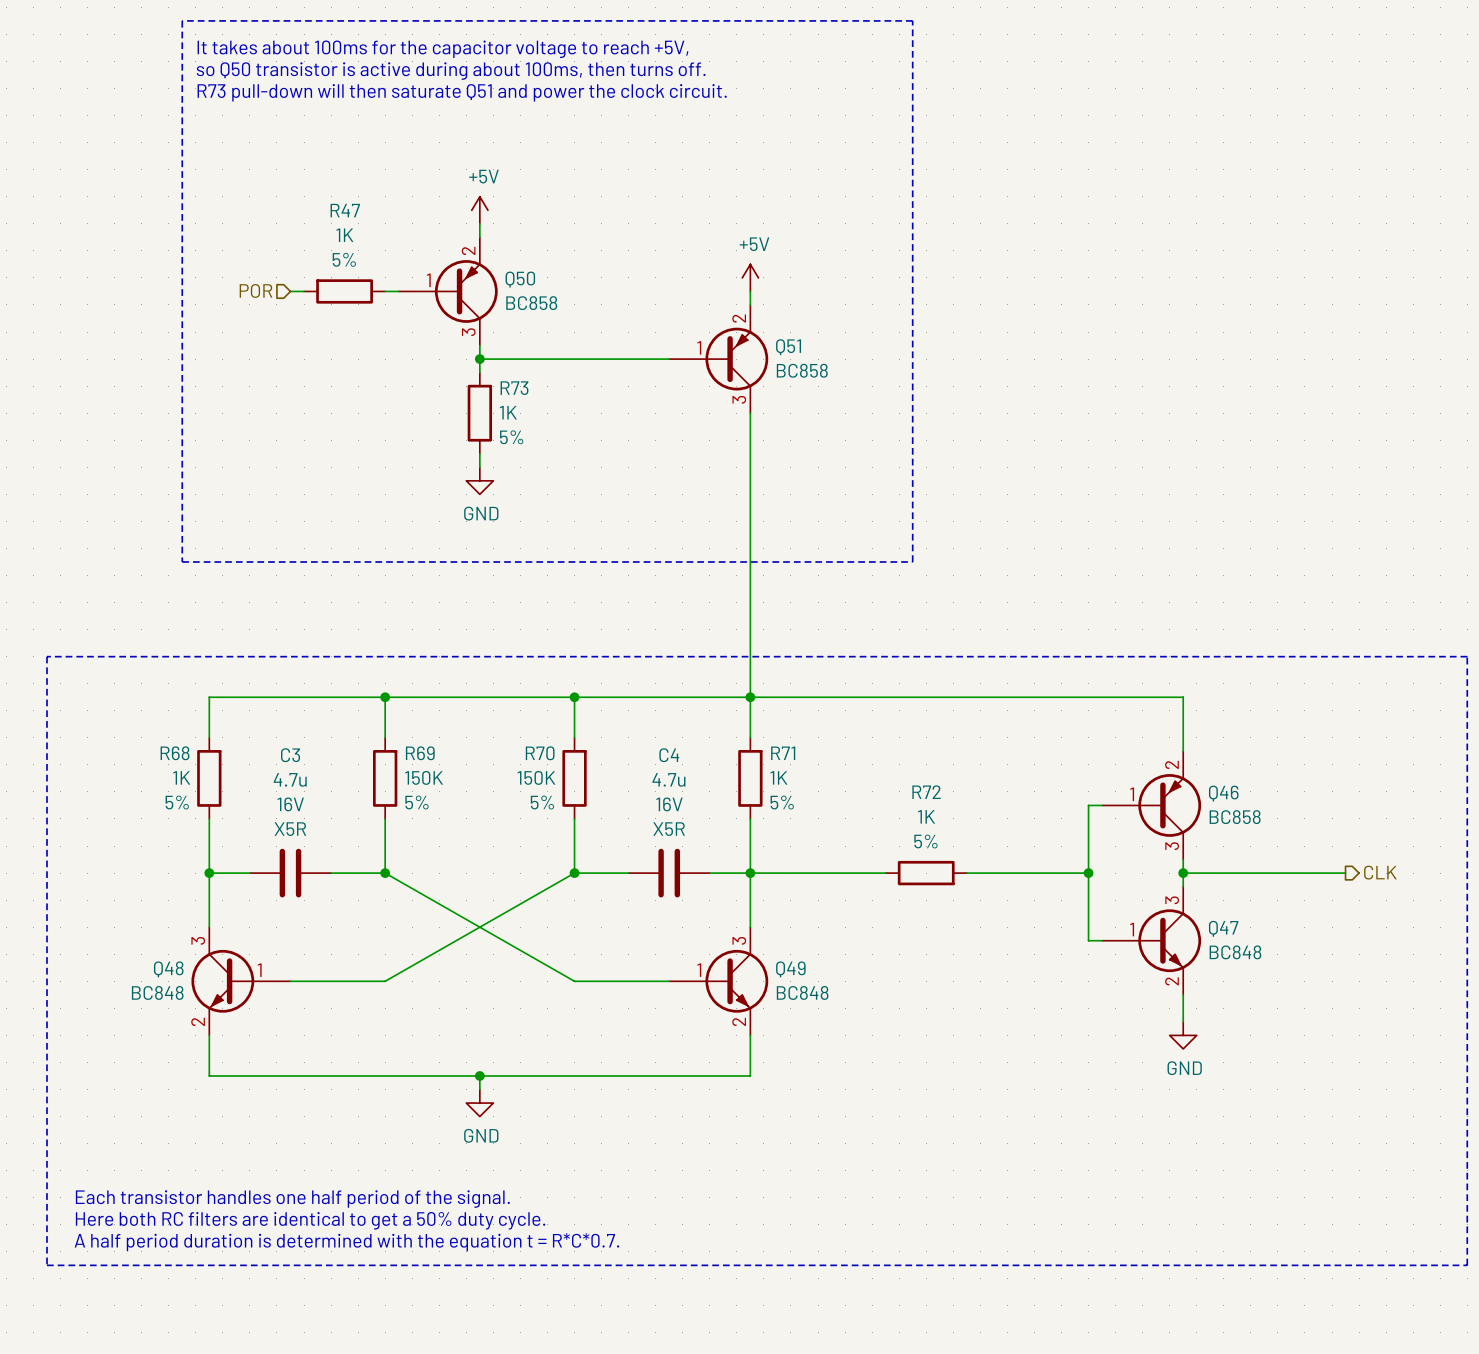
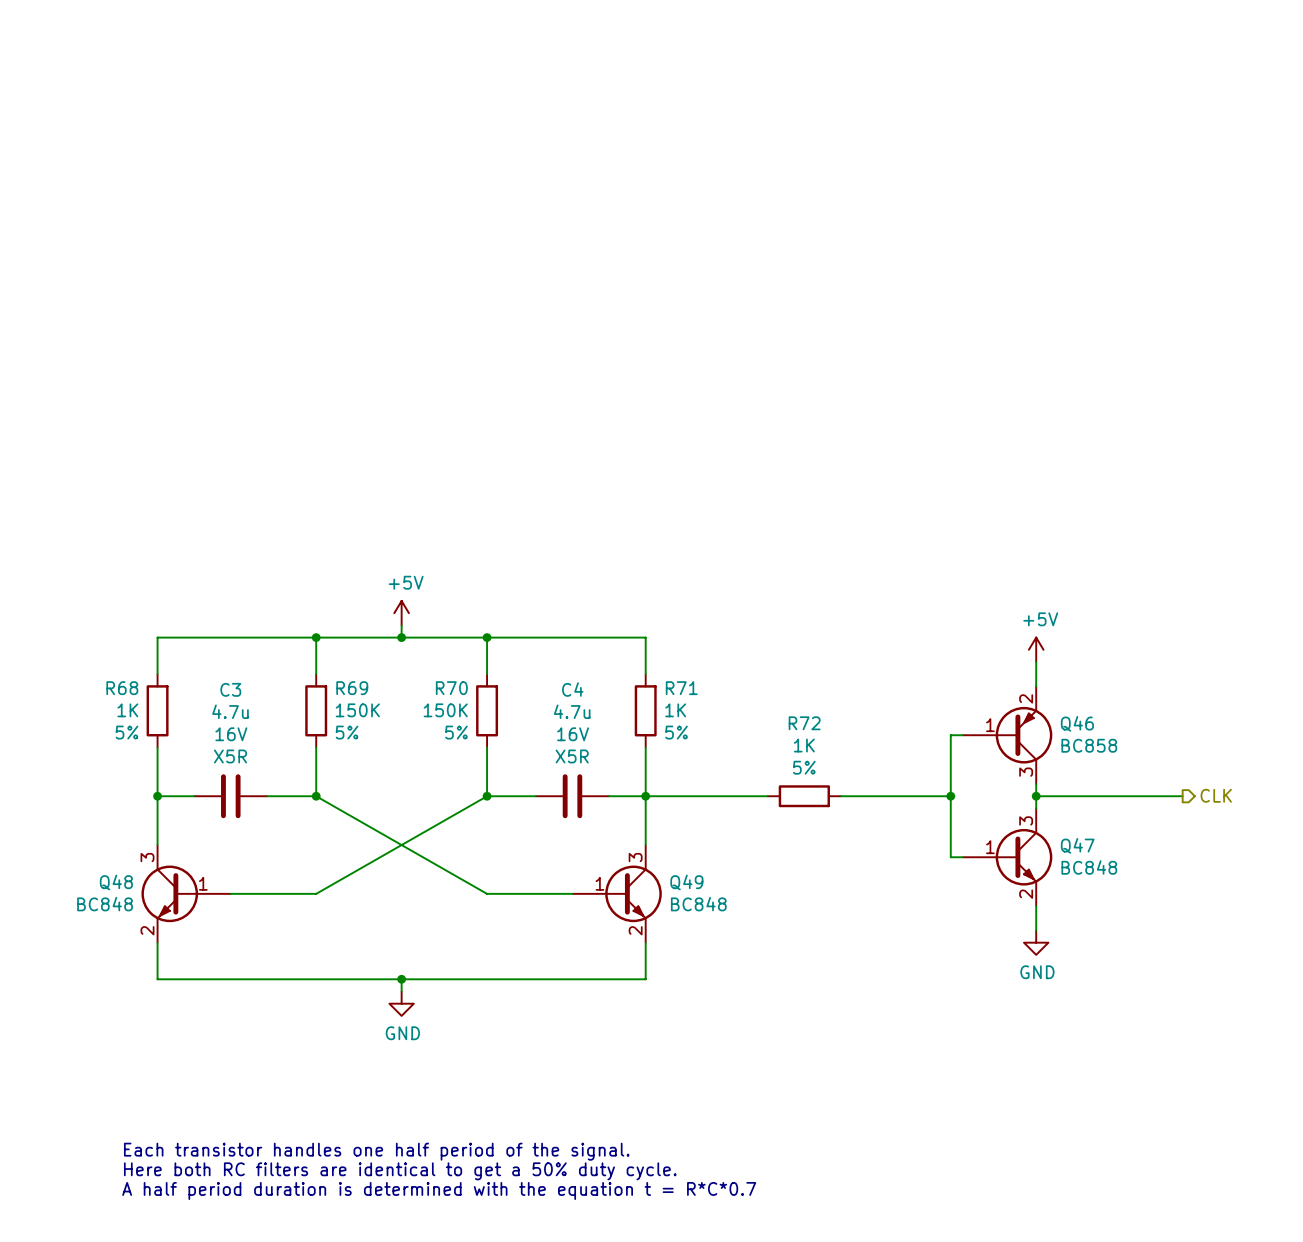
line: (182, 20) (182, 561) (912, 561) (912, 20) (182, 20) -> none
text: It takes about 100ms for the capacitor voltage to reach +5V, (443, 49) -> none
text: so Q50 transistor is active during about 100ms, then turns off. (451, 71) -> none
text: R73 pull-down will then saturate Q51 and power the clock circuit. (462, 92) -> none
power symbol: +5V (479, 210) -> none
wire: (479, 223) (479, 237) -> none
power symbol: +5V (750, 277) -> none
hierarchical label: POR (256, 290) -> none
wire: (290, 291) (304, 291) -> none
R47: 1K (344, 291) -> none
wire: (385, 291) (398, 291) -> none
Q50: BC858 (448, 291) -> none
wire: (750, 291) (750, 304) -> none
wire: (479, 345) (479, 372) -> none
wire: (479, 359) (669, 359) -> none
junction: (479, 359) -> none
Q51: BC858 (718, 359) -> none
R73: 1K (479, 413) -> none
wire: (750, 413) (750, 697) (1183, 697) (1183, 724) -> none
wire: (479, 453) (479, 467) -> (401, 625) (401, 637)
power symbol: GND (479, 480) -> none
line: (47, 656) (47, 1265) (1467, 1265) (1467, 656) (47, 656) -> none
power symbol: none -> +5V (401, 613)
junction: none -> (401, 637)
junction: (750, 697) -> none
power symbol: none -> +5V (1036, 649)
text position: Each transistor handles one half period of the signal. (292, 1199) -> Each transistor handles one half period of the signal. (376, 1151)
text position: Here both RC filters are identical to get a 50% duty cycle. (310, 1220) -> Here both RC filters are identical to get a 50% duty cycle. (400, 1171)
text: A half period duration is determined with the equation t = R*C*0.7. (346, 1242) -> none
text: none -> A half period duration is determined with the equation t = R*C*0.7 (439, 1190)

